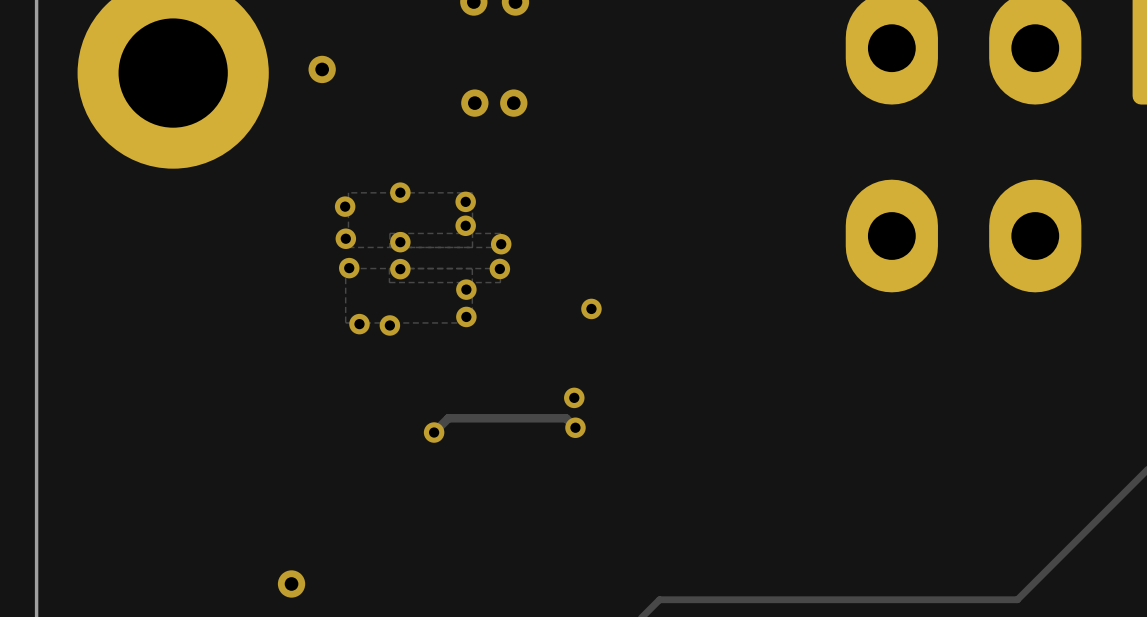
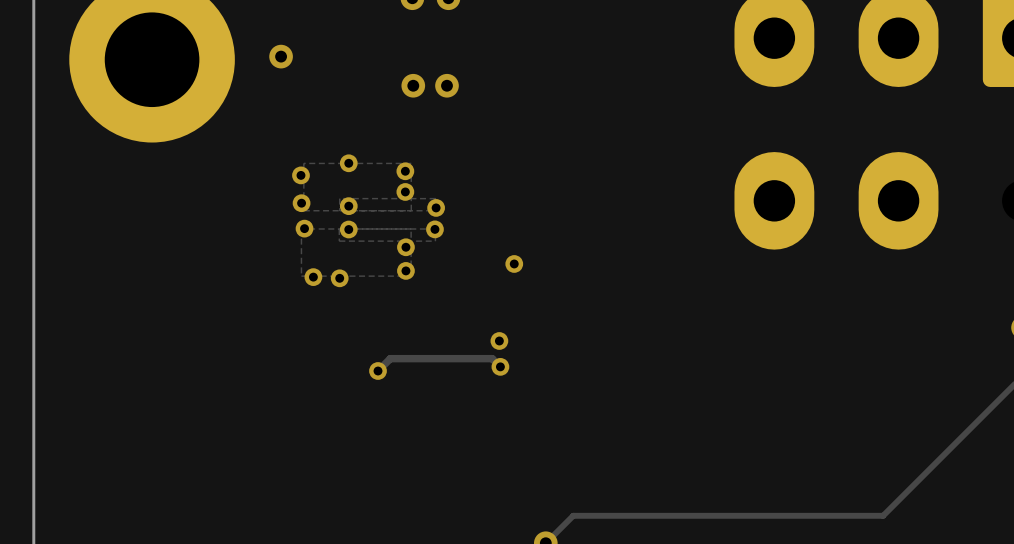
via: (291, 583) -> none

